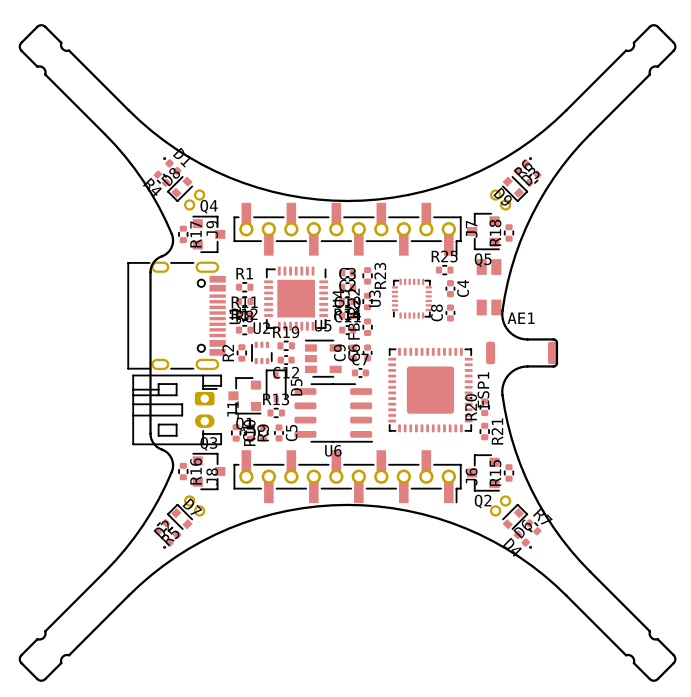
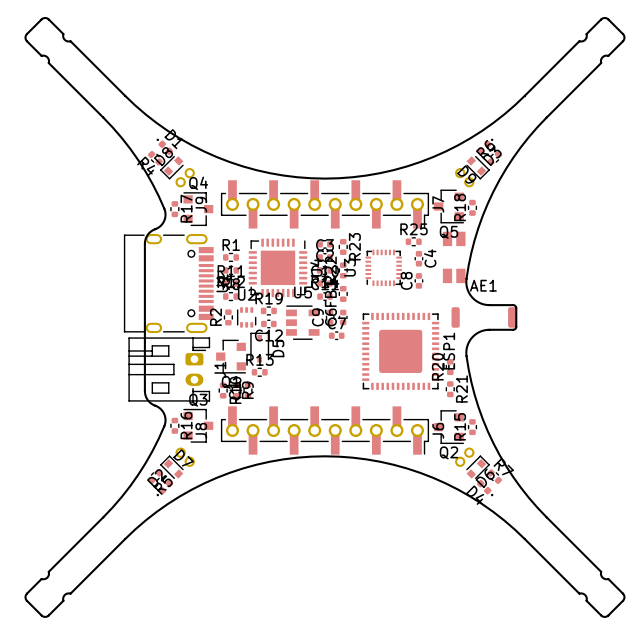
U6: (333, 412) -> none
C5: (279, 432) -> none

